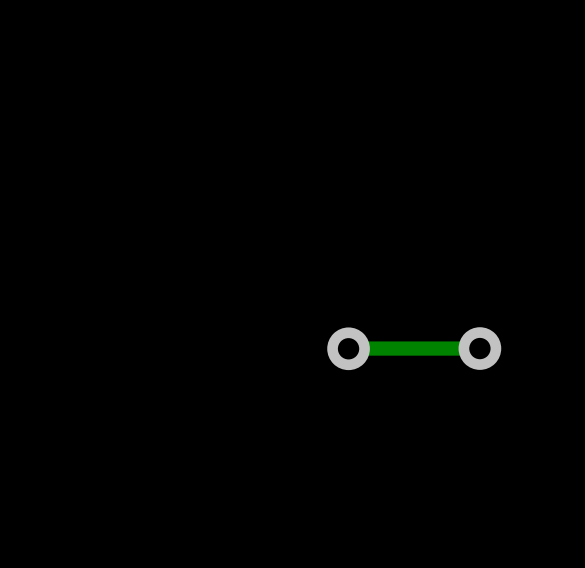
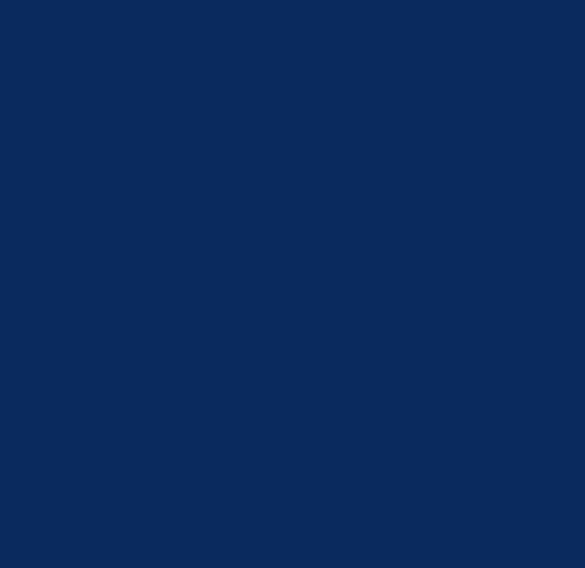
via: (348, 348) -> none
track: (479, 348) (348, 348) -> none
via: (479, 348) -> none

